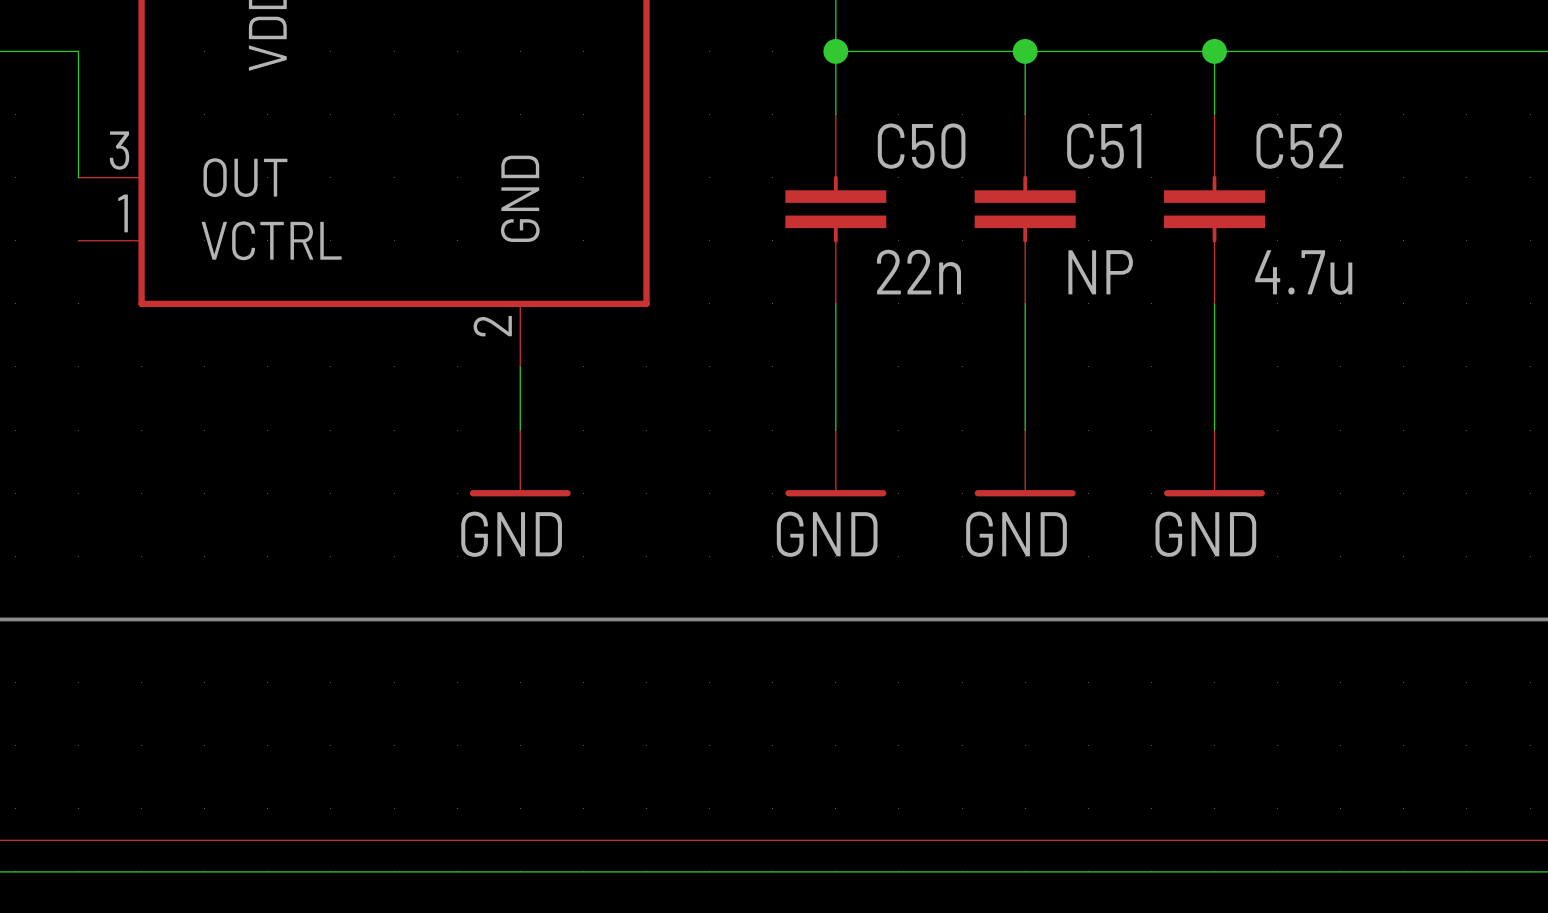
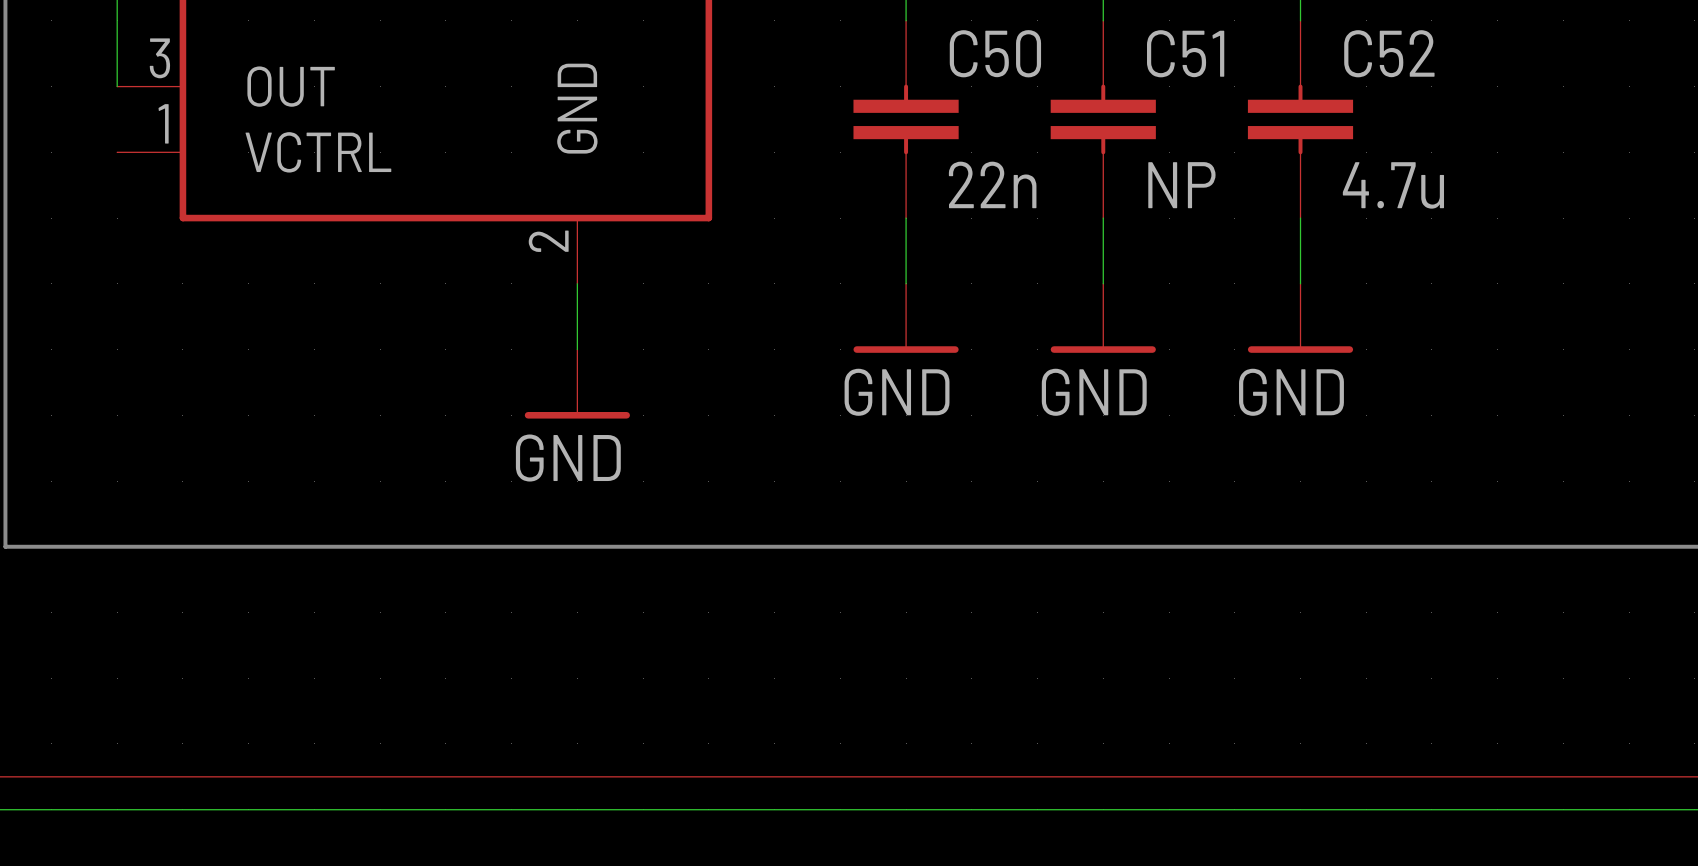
power symbol position: GND (835, 463) -> GND (906, 318)
power symbol position: GND (1025, 463) -> GND (1103, 318)
power symbol position: GND (1214, 463) -> GND (1300, 318)

